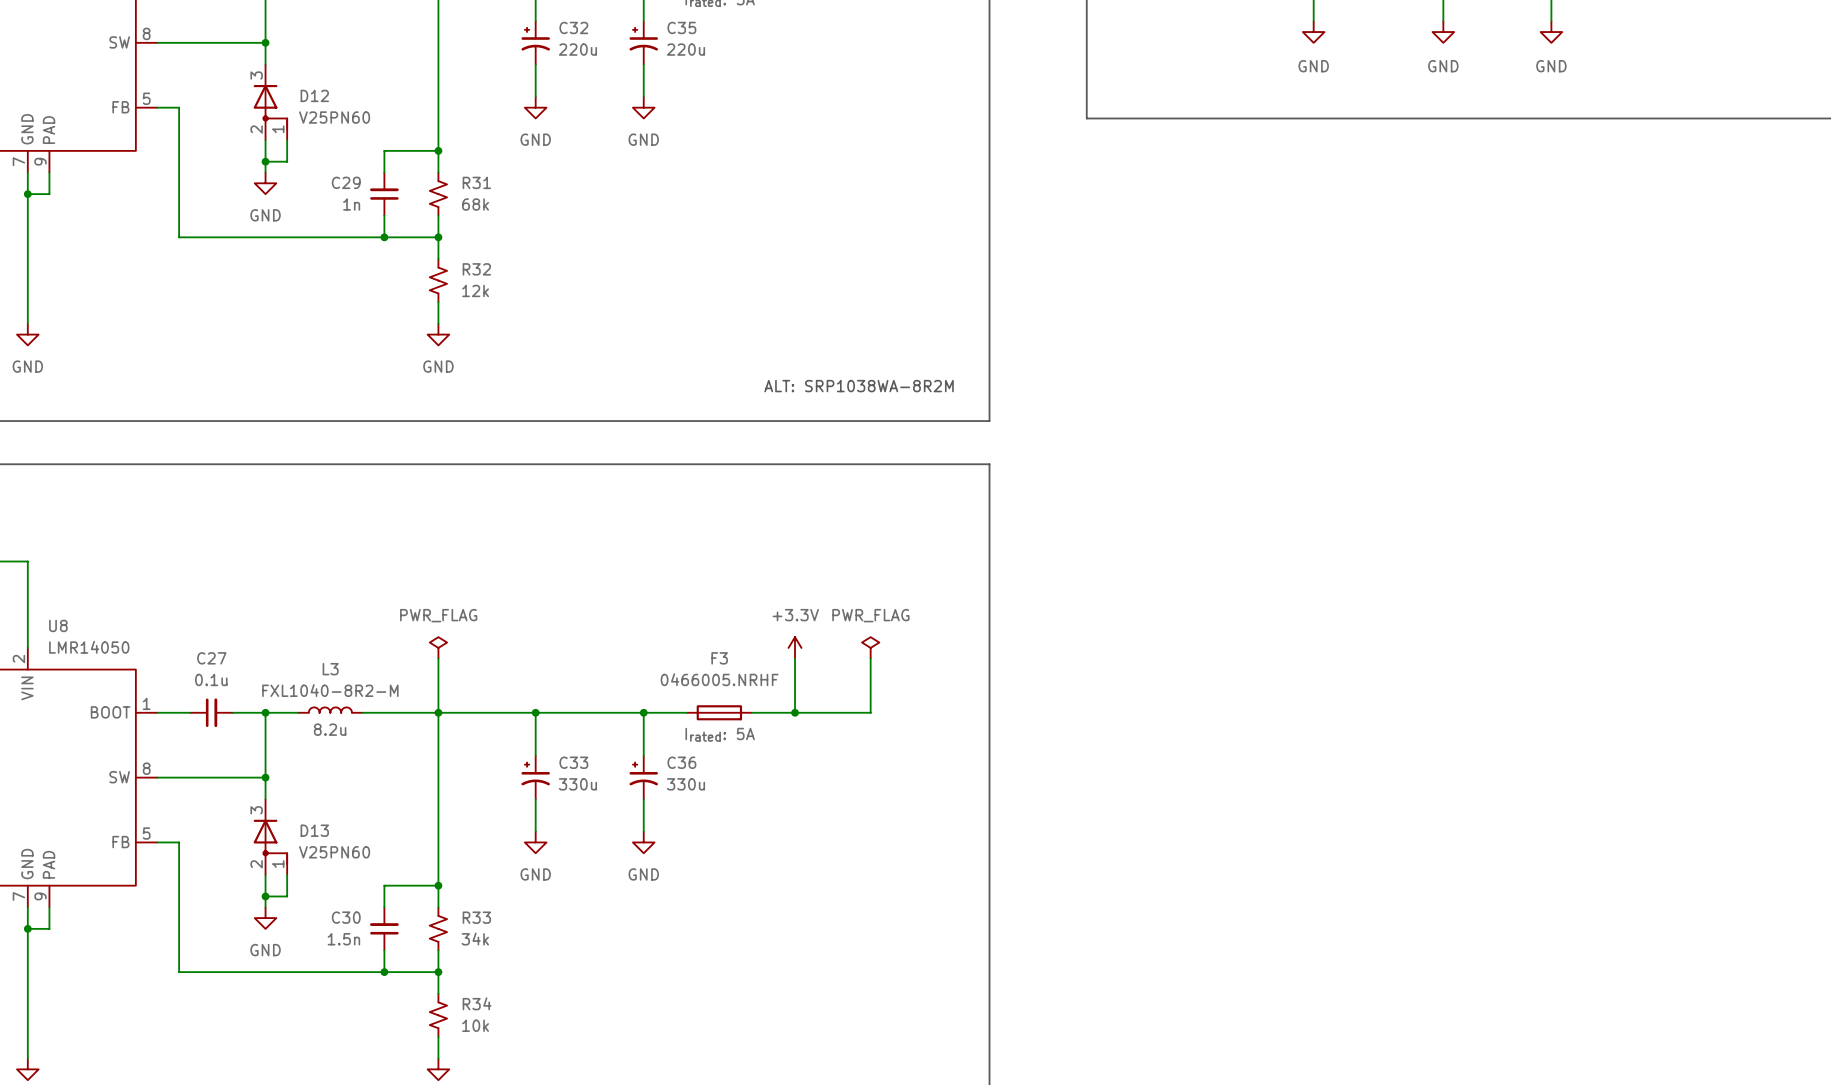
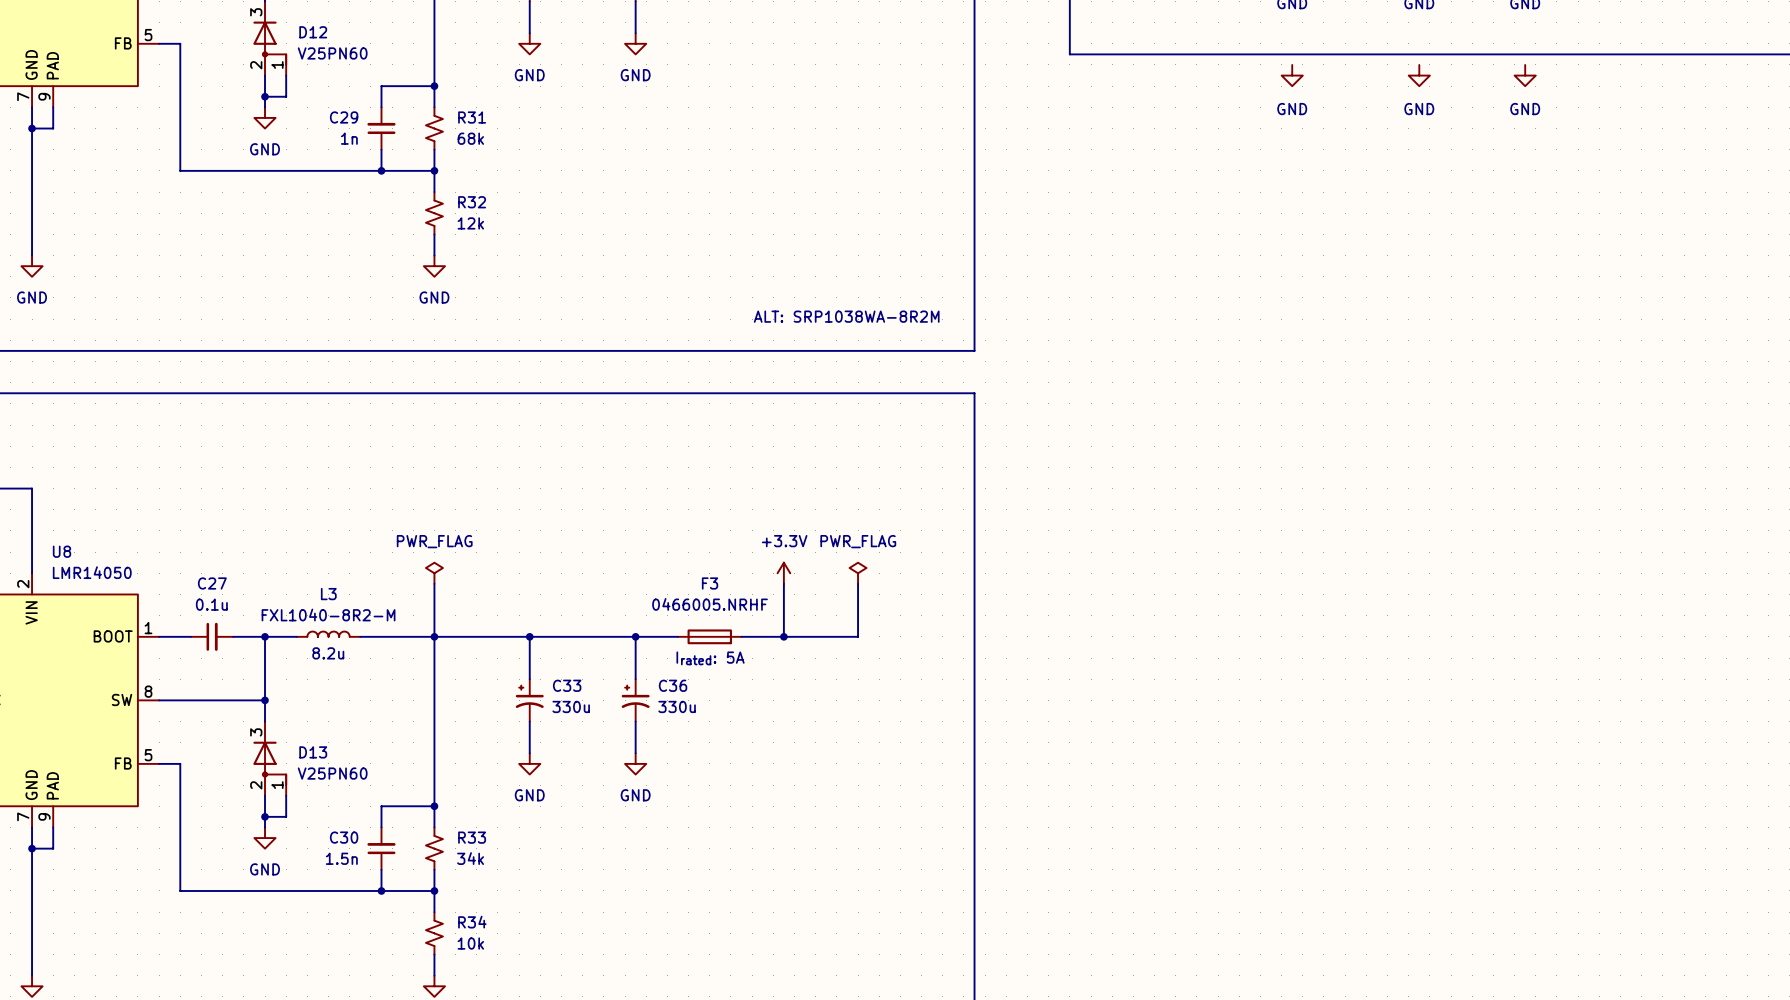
power symbol: none -> GND (1292, 75)
power symbol: none -> GND (1419, 75)
power symbol: none -> GND (1525, 75)

